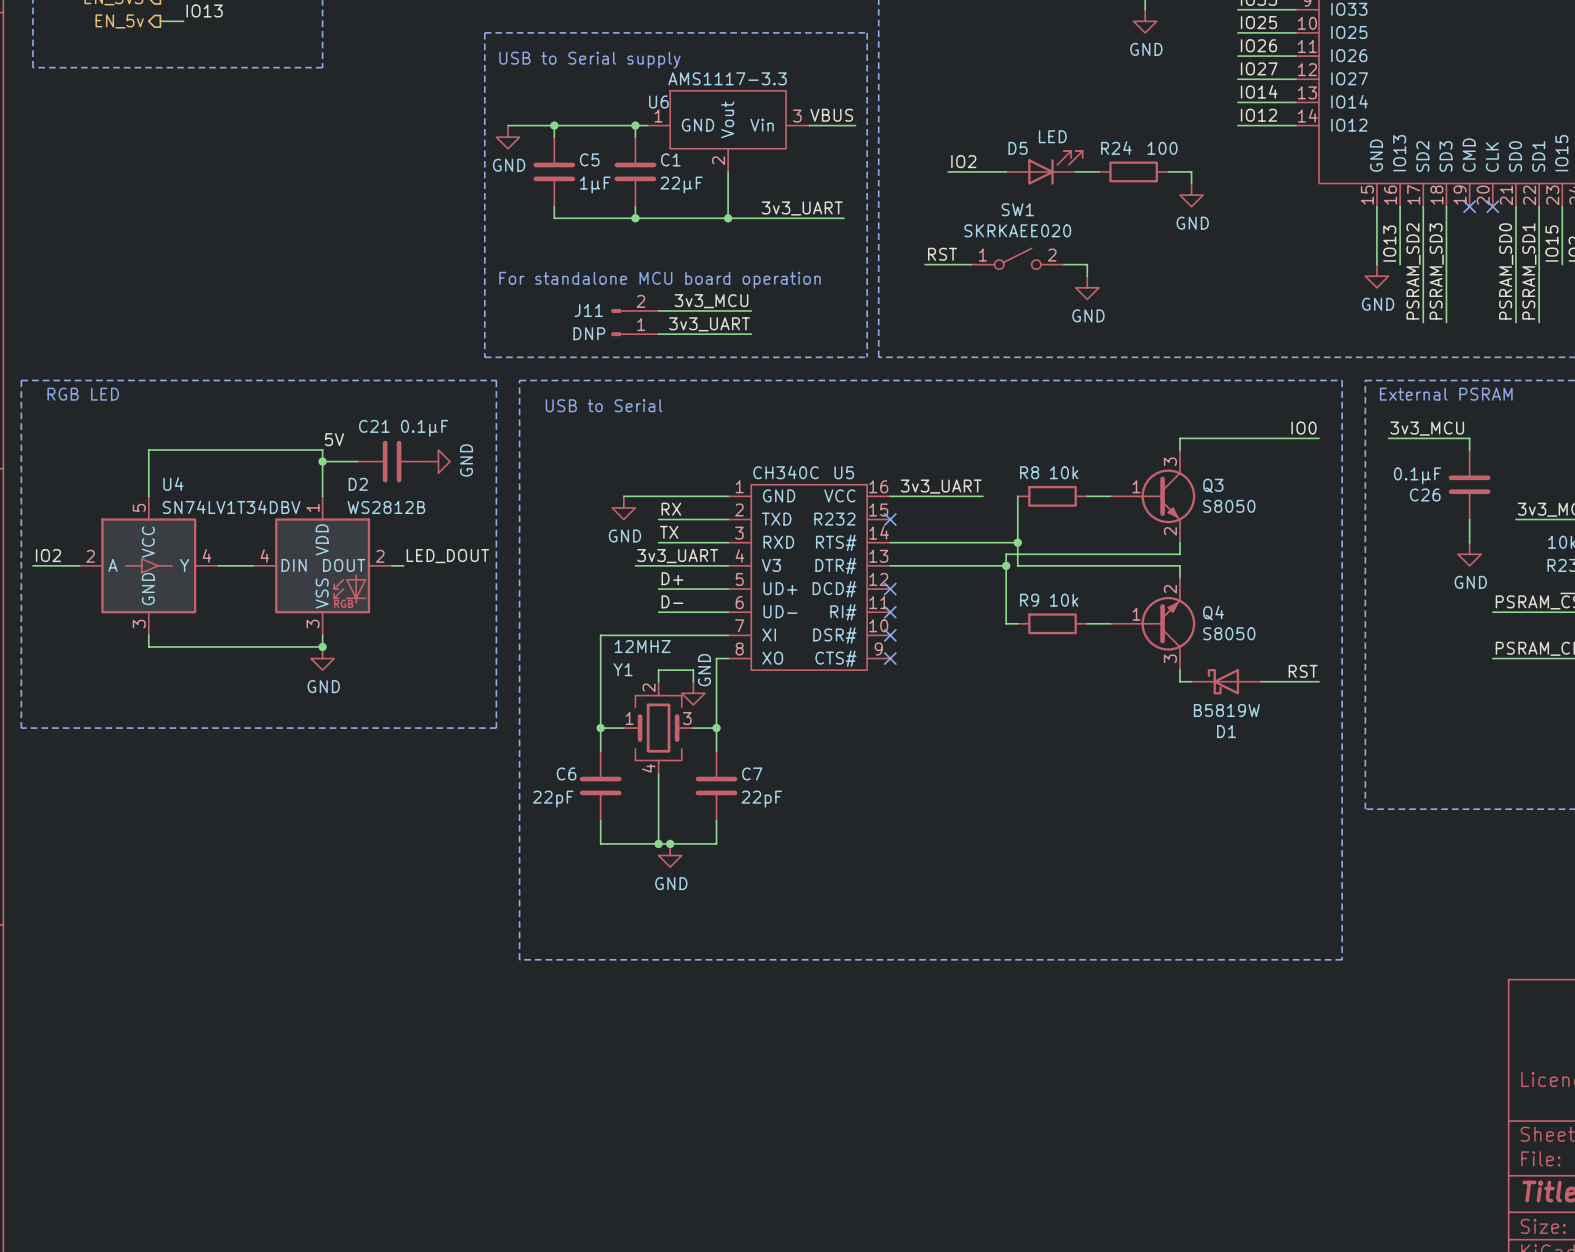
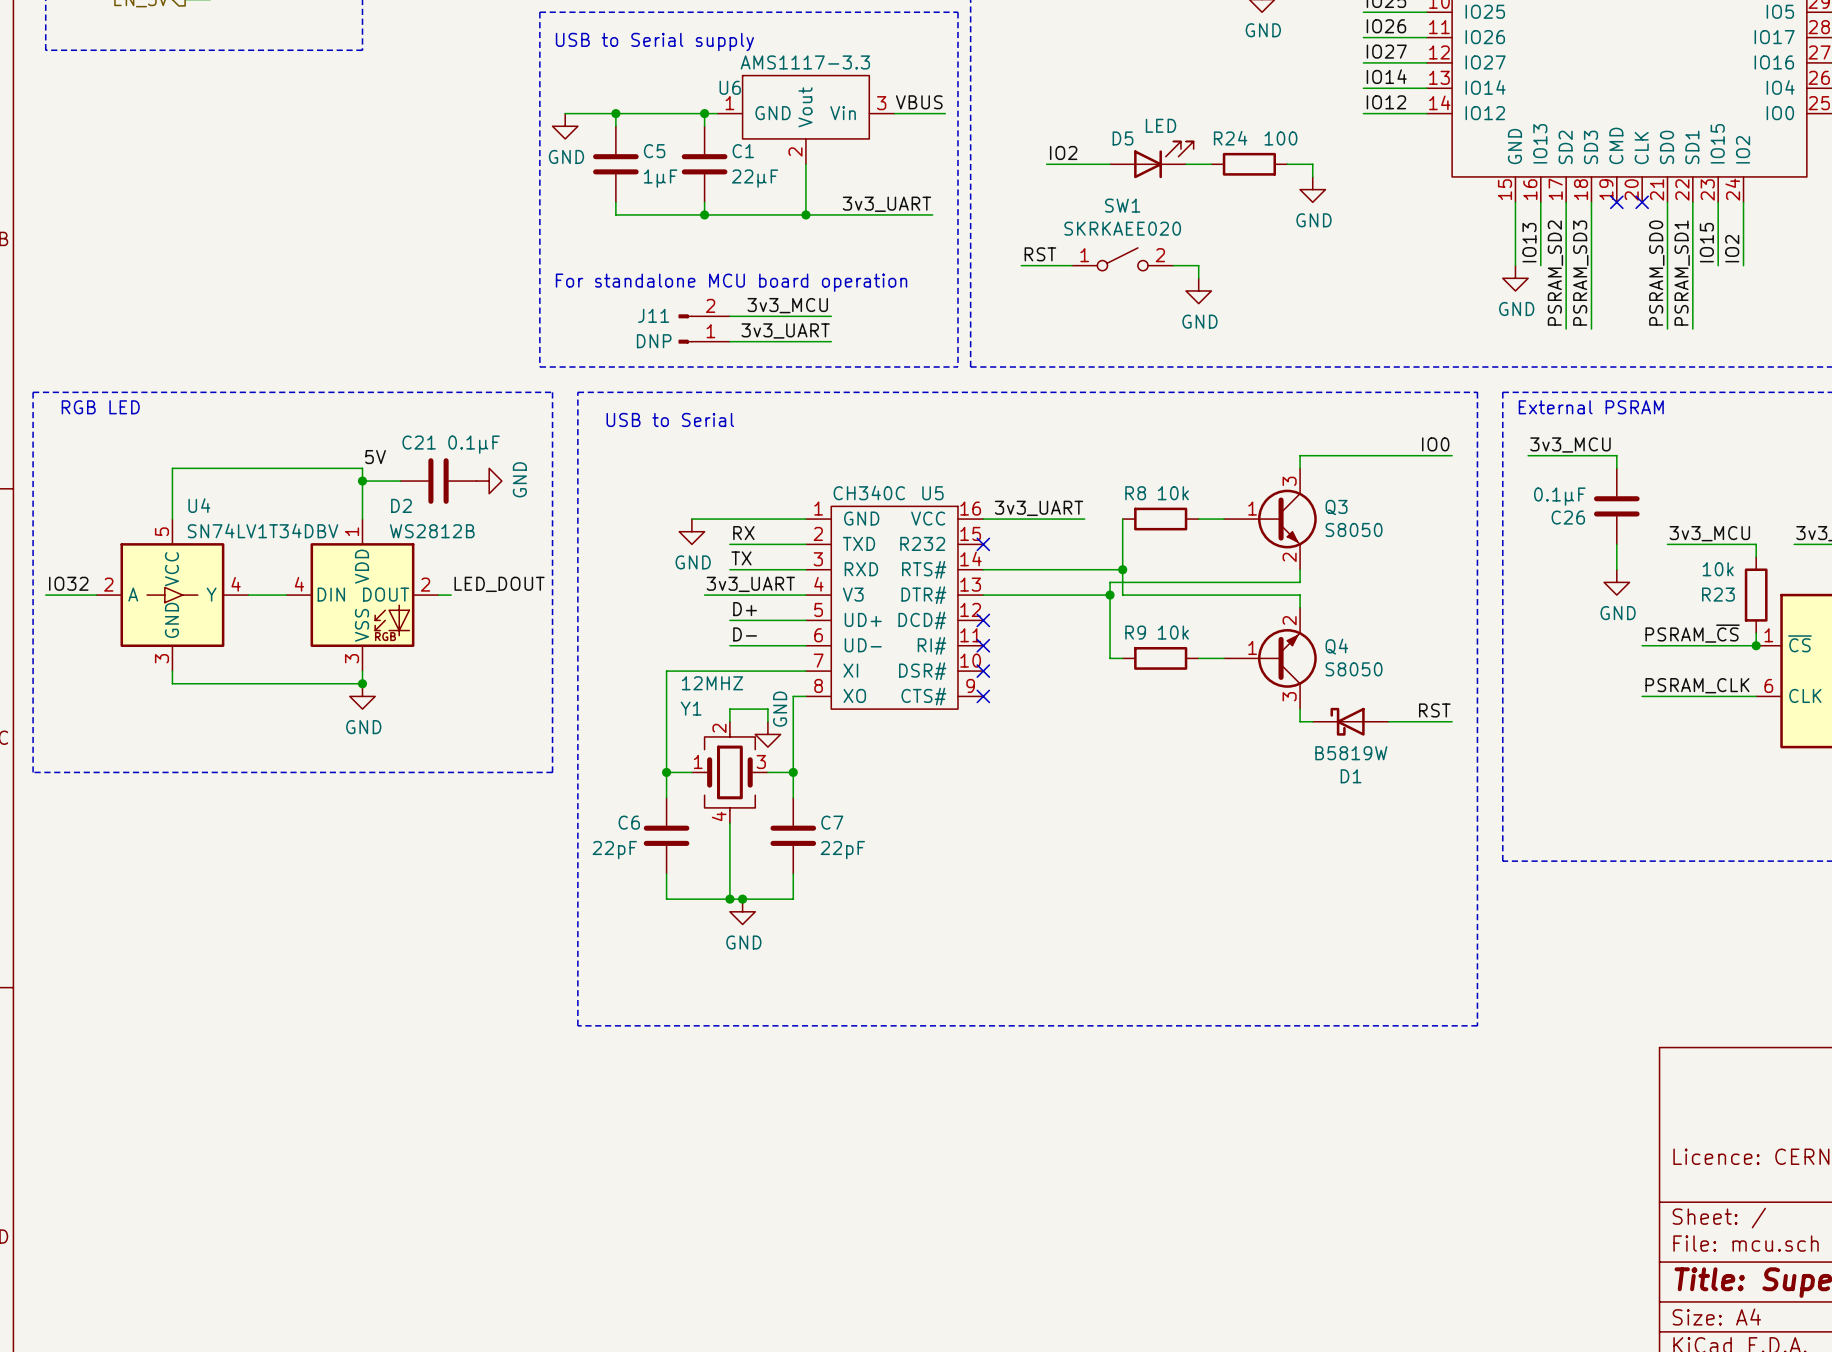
label: IO2 (48, 555) -> IO32 (68, 583)

